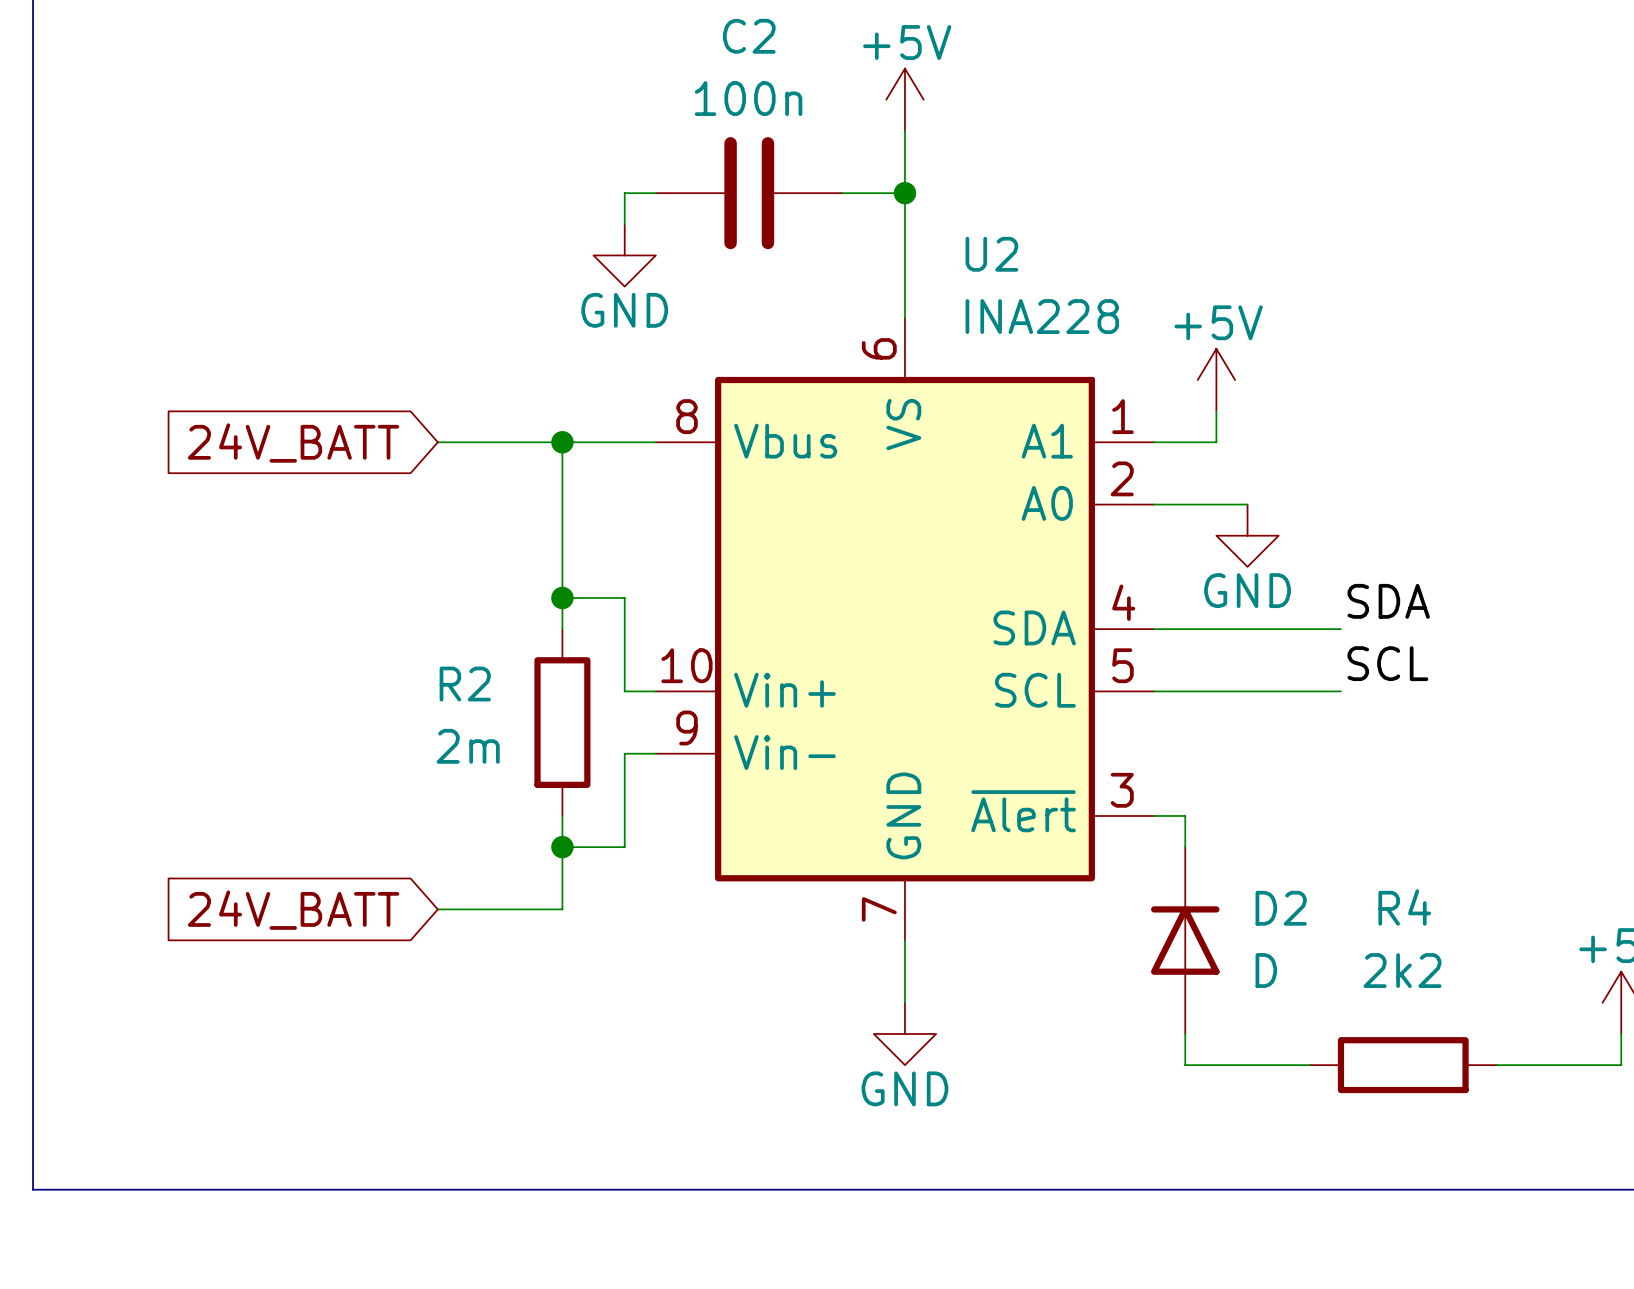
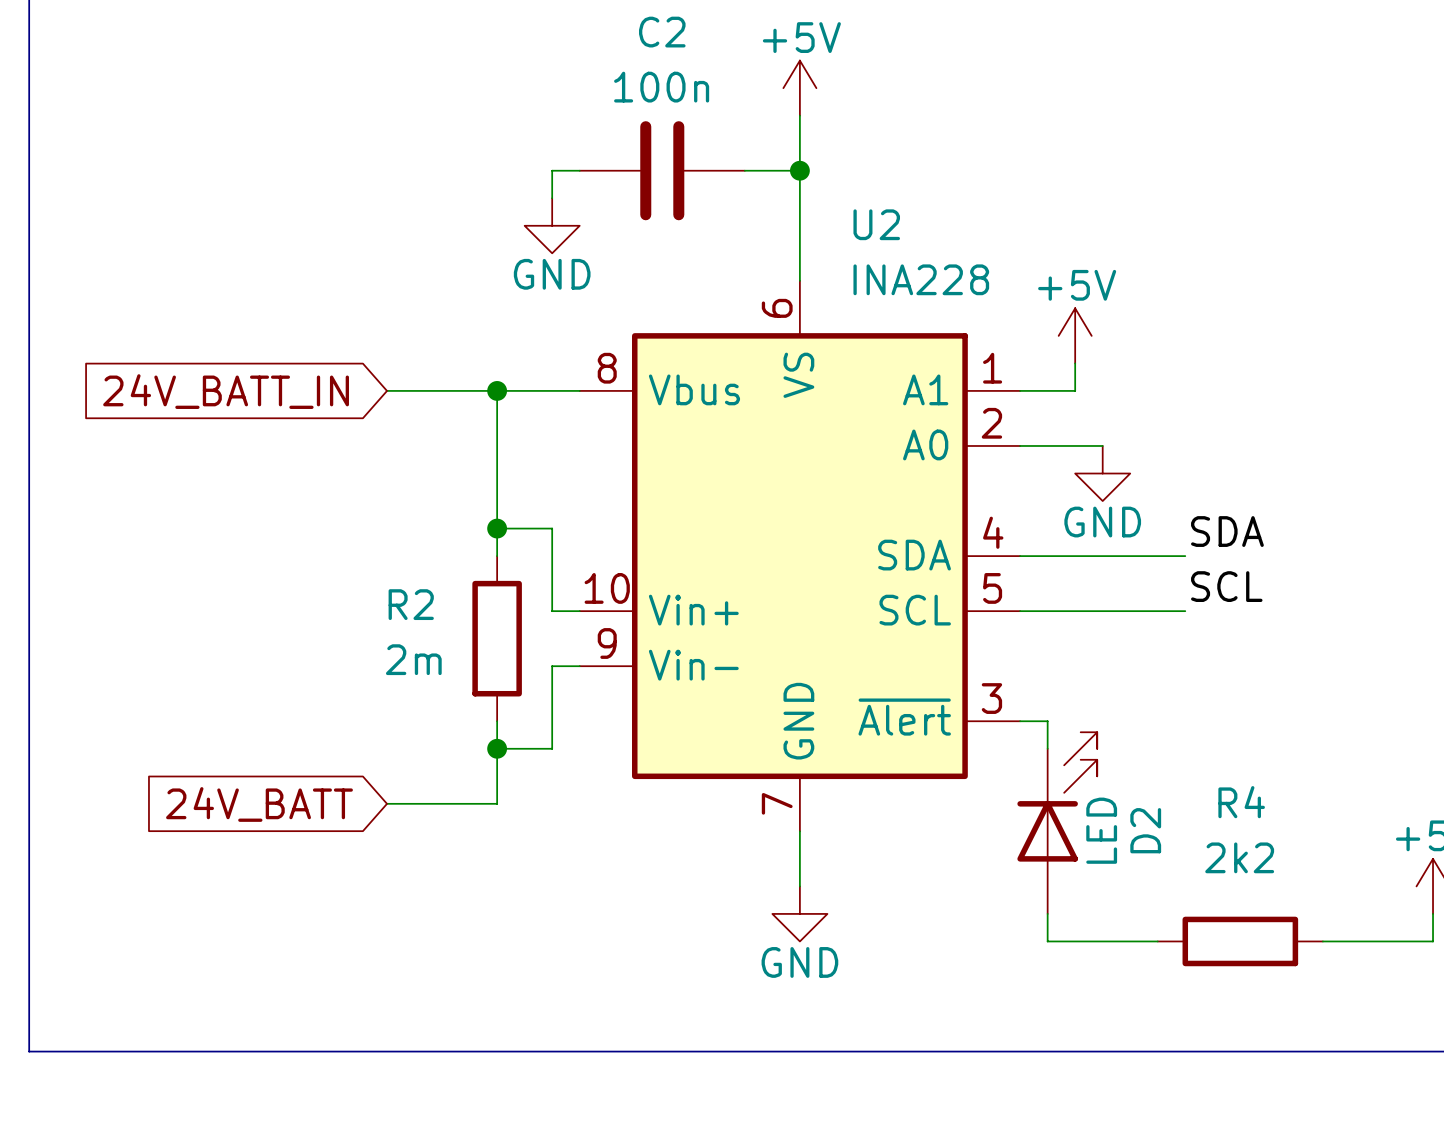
global label: 24V_BATT (293, 443) -> 24V_BATT_IN (226, 391)
D2 symbol: [1151, 847, 1220, 1034] -> [1017, 732, 1098, 914]
D2 value: D (1266, 970) -> LED (1101, 830)

